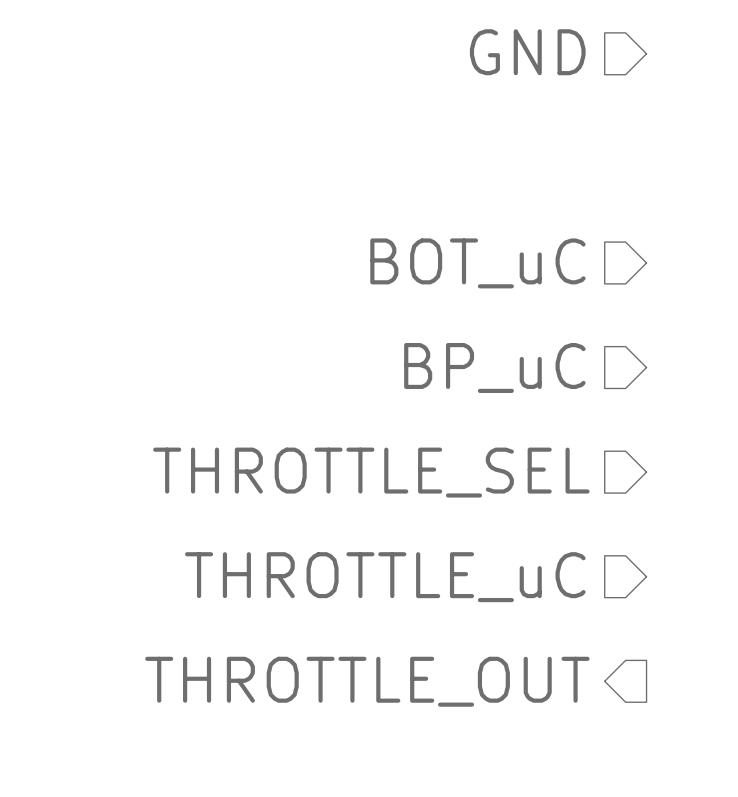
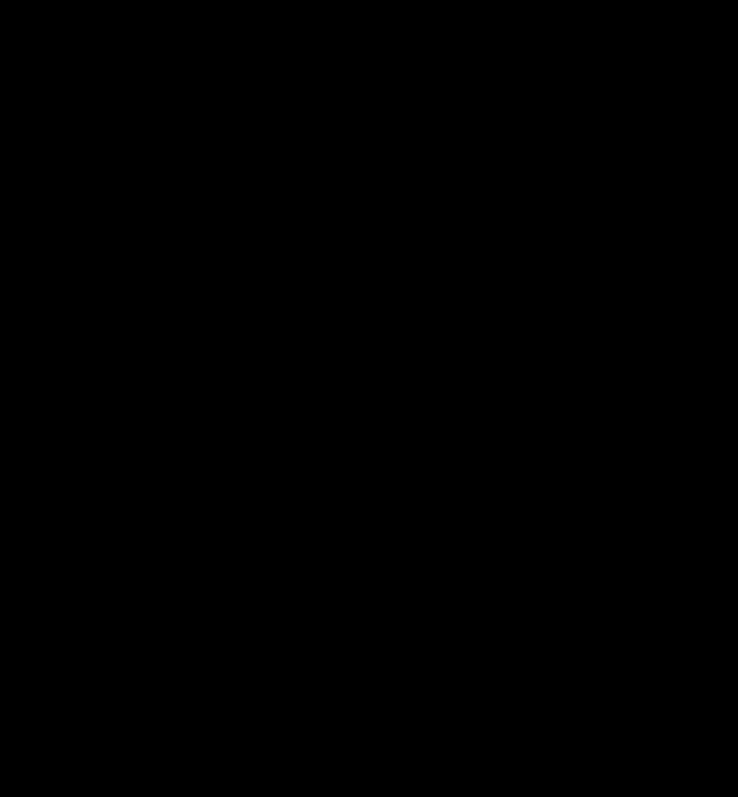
hierarchical label: GND (527, 52) -> none
hierarchical label: BOT_uC (477, 263) -> none
hierarchical label: BP_uC (494, 367) -> none
hierarchical label: THROTTLE_SEL (371, 472) -> none
hierarchical label: THROTTLE_uC (385, 577) -> none
hierarchical label: THROTTLE_OUT (367, 681) -> none

